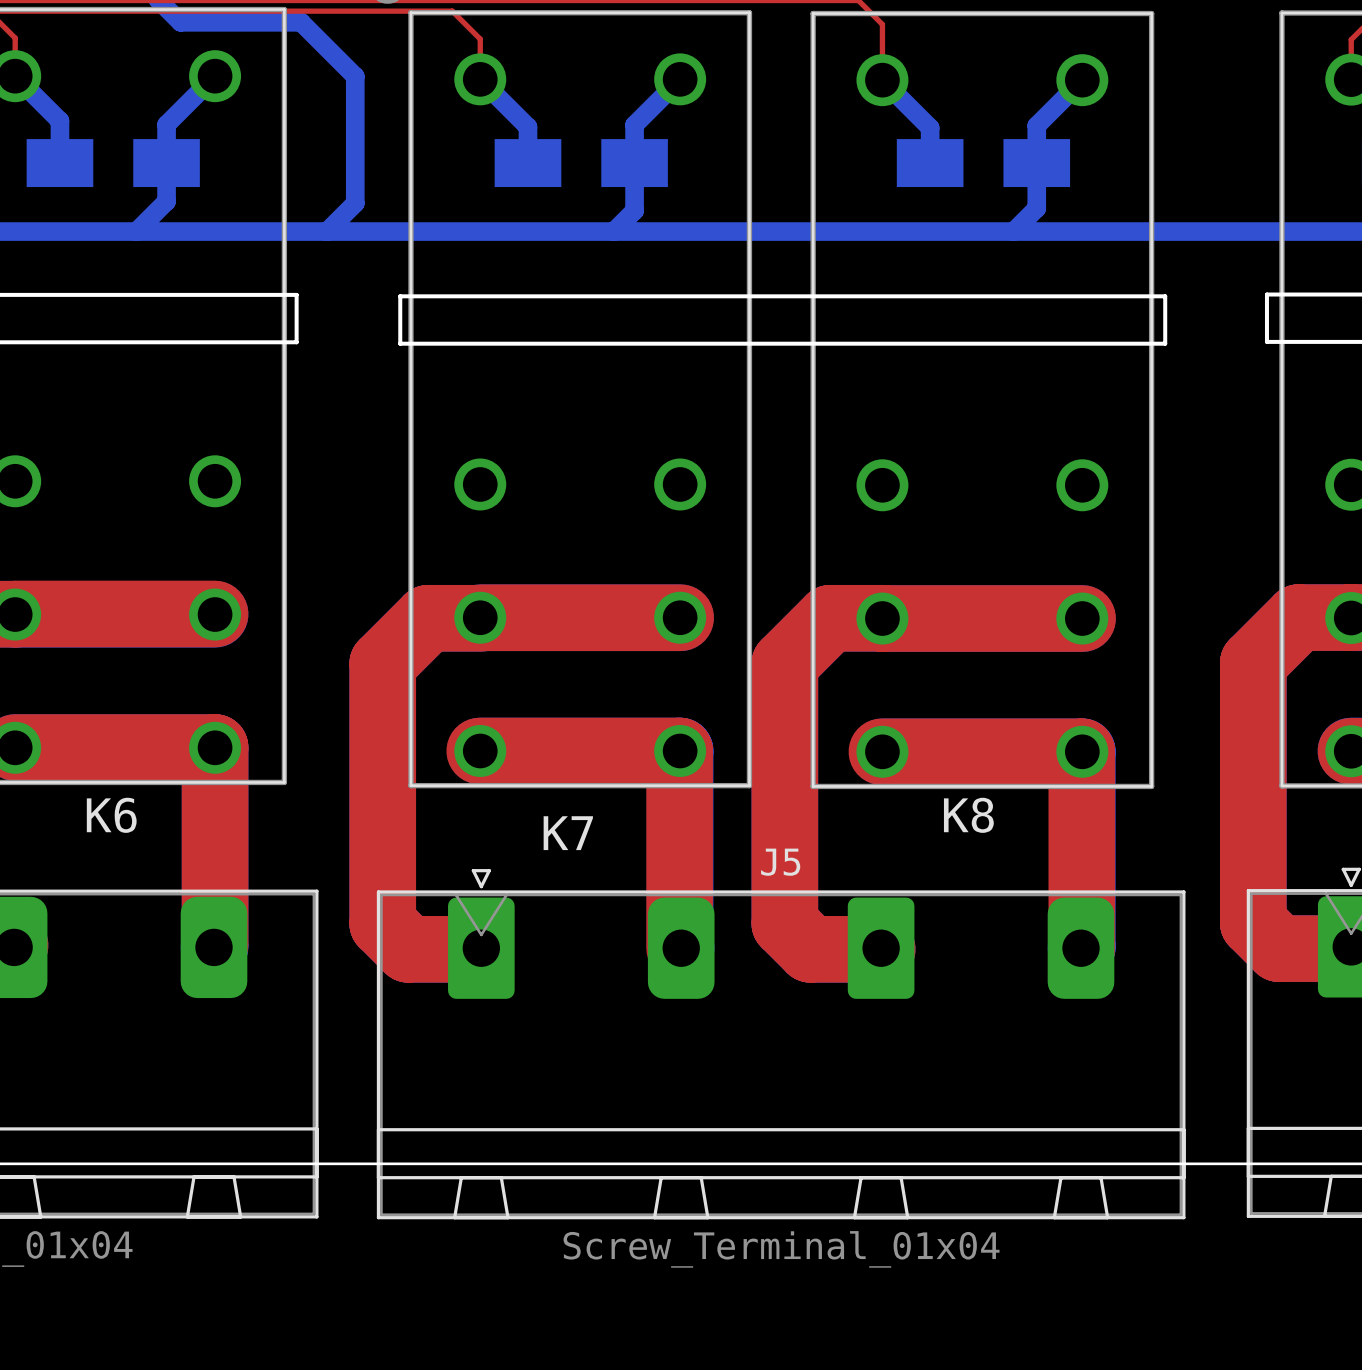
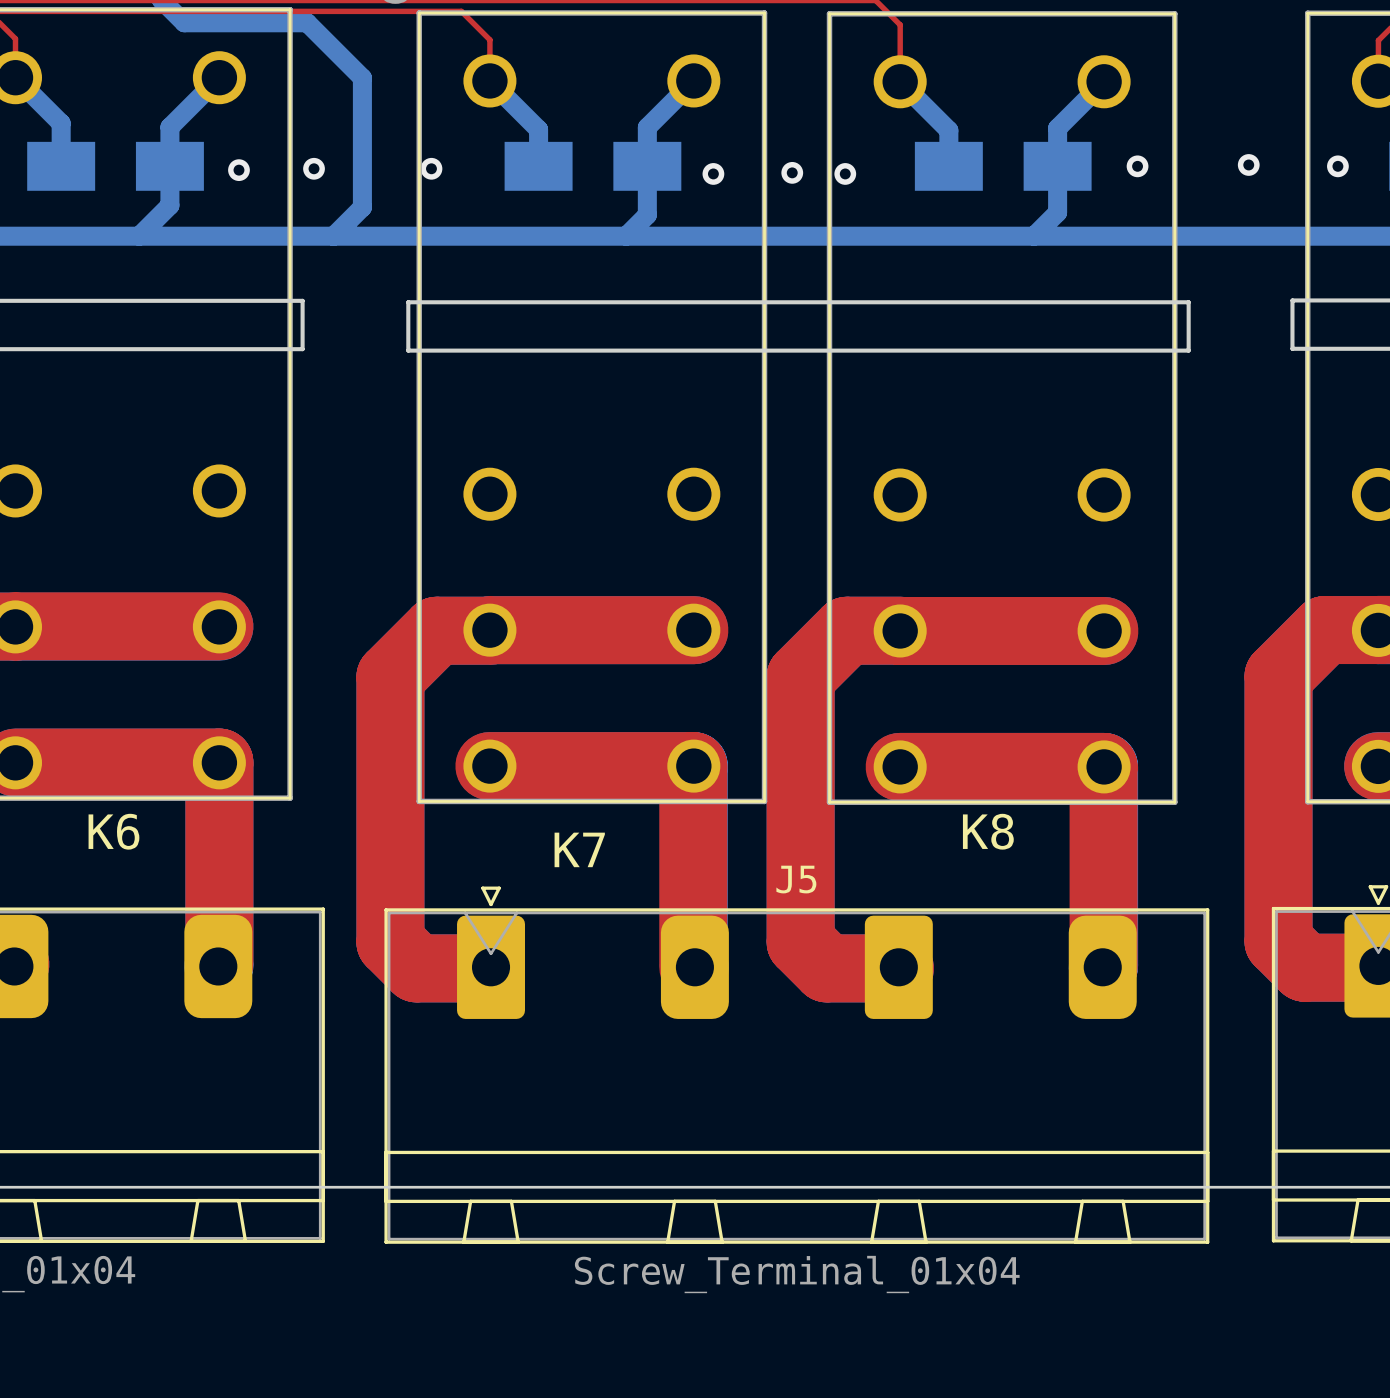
via: none -> (1248, 164)
via: none -> (1137, 166)
via: none -> (1337, 166)
via: none -> (314, 168)
via: none -> (431, 168)
via: none -> (238, 170)
via: none -> (792, 172)
via: none -> (713, 173)
via: none -> (845, 173)

